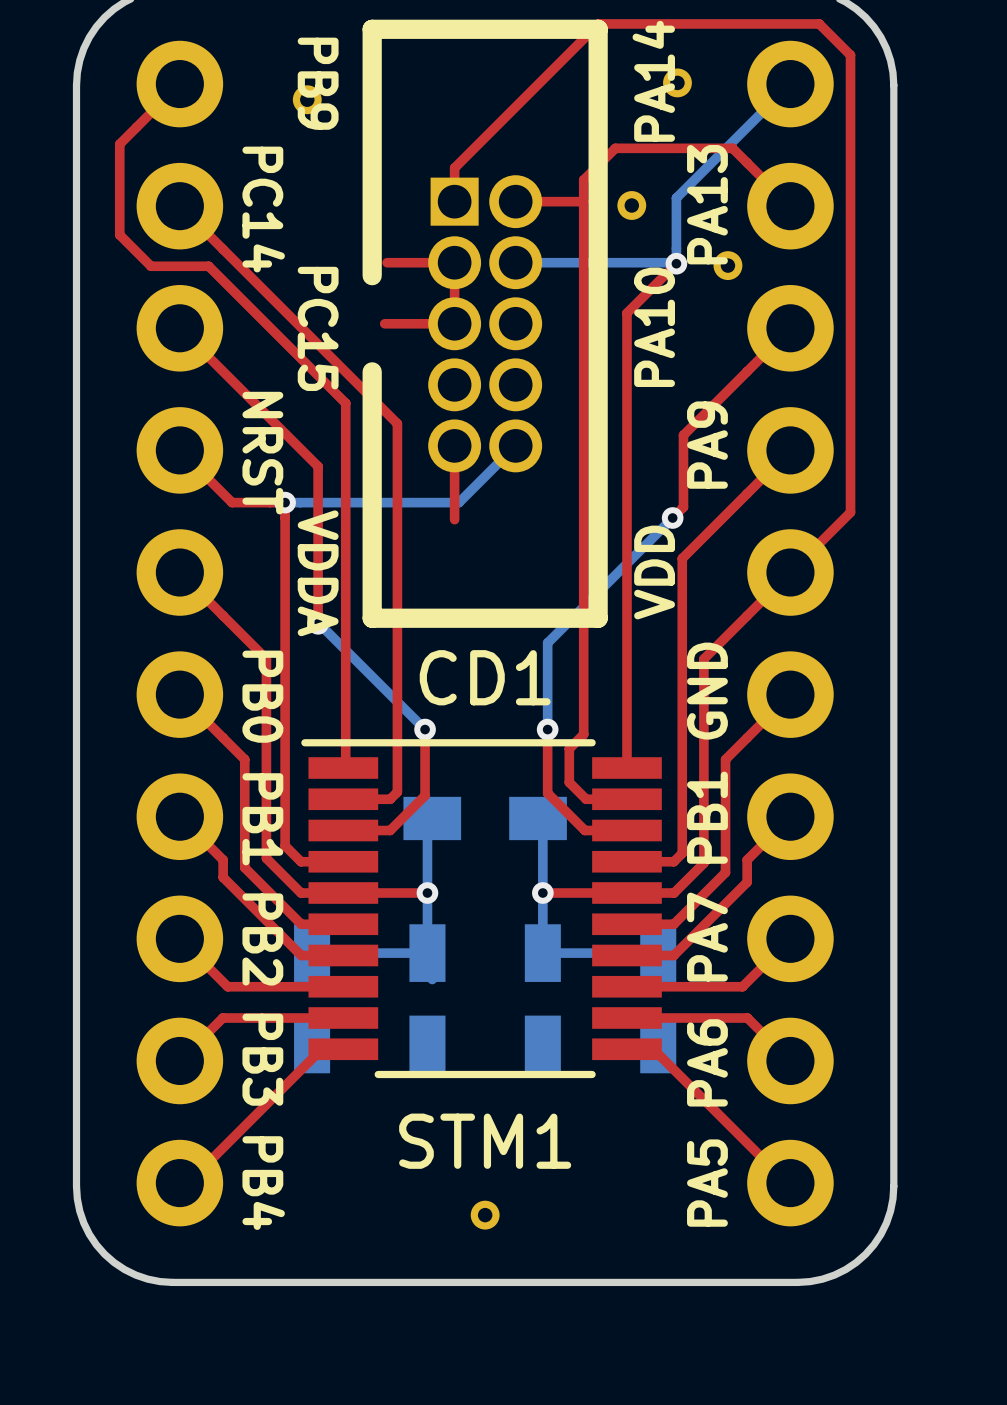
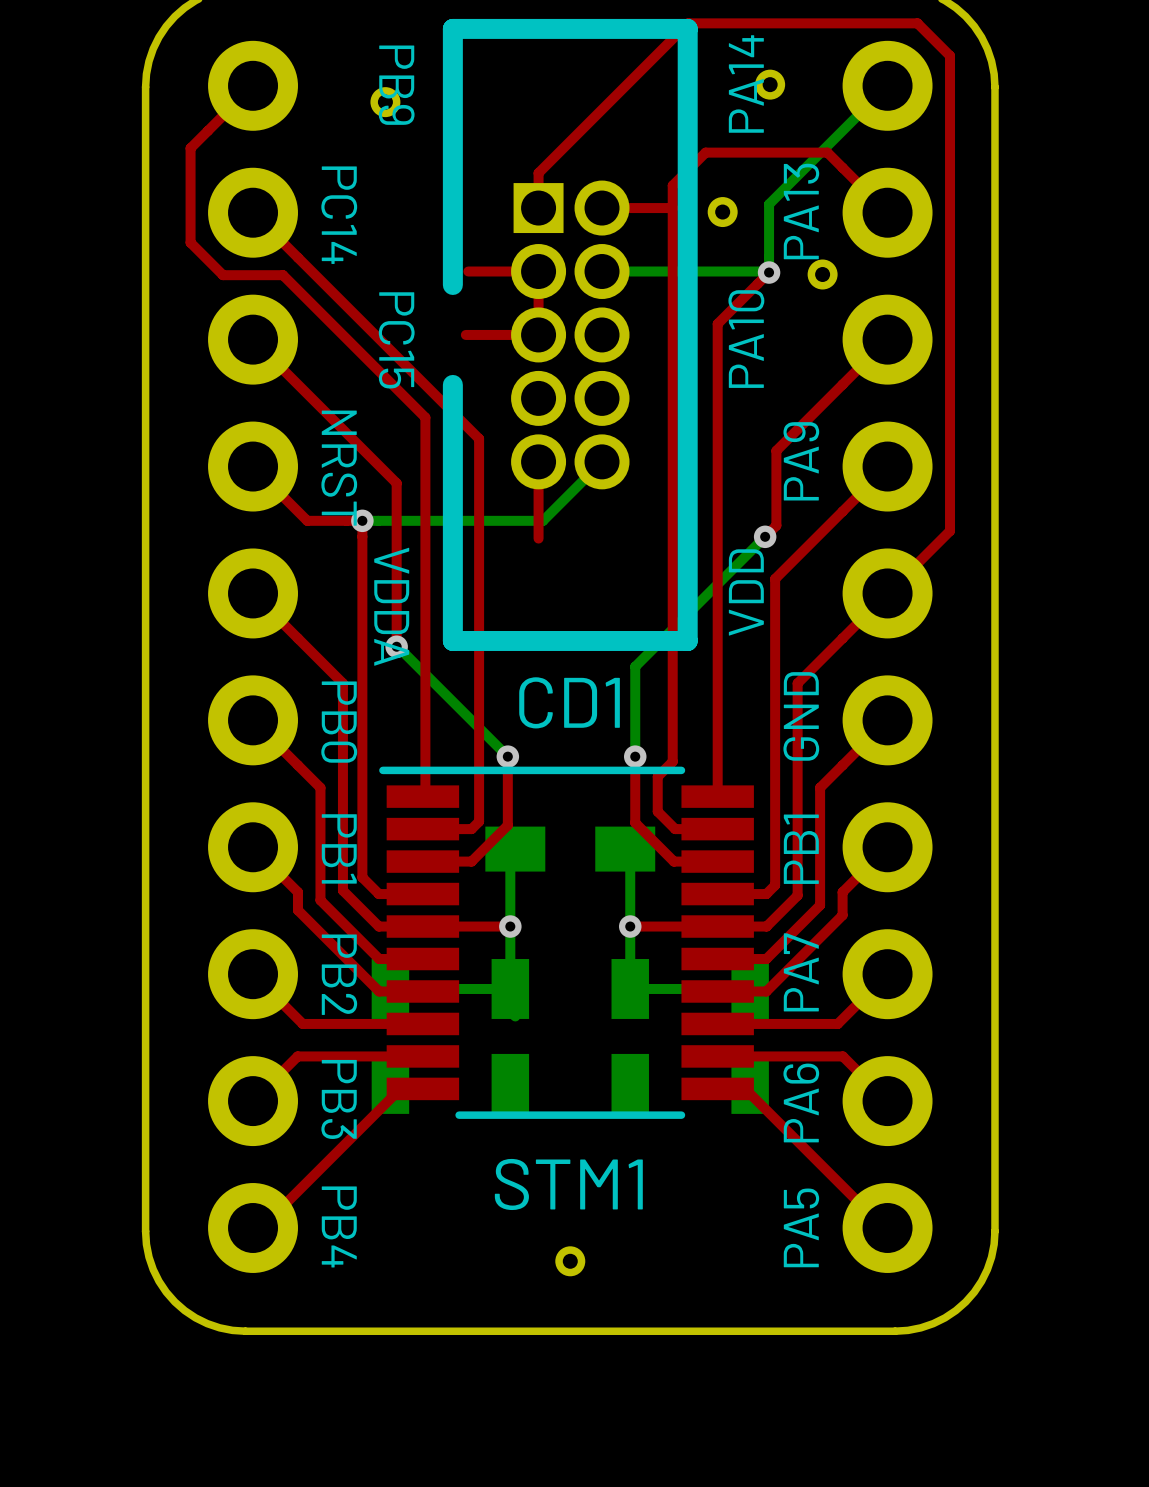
text position: VDDA (318, 573) -> VDDA (391, 606)

